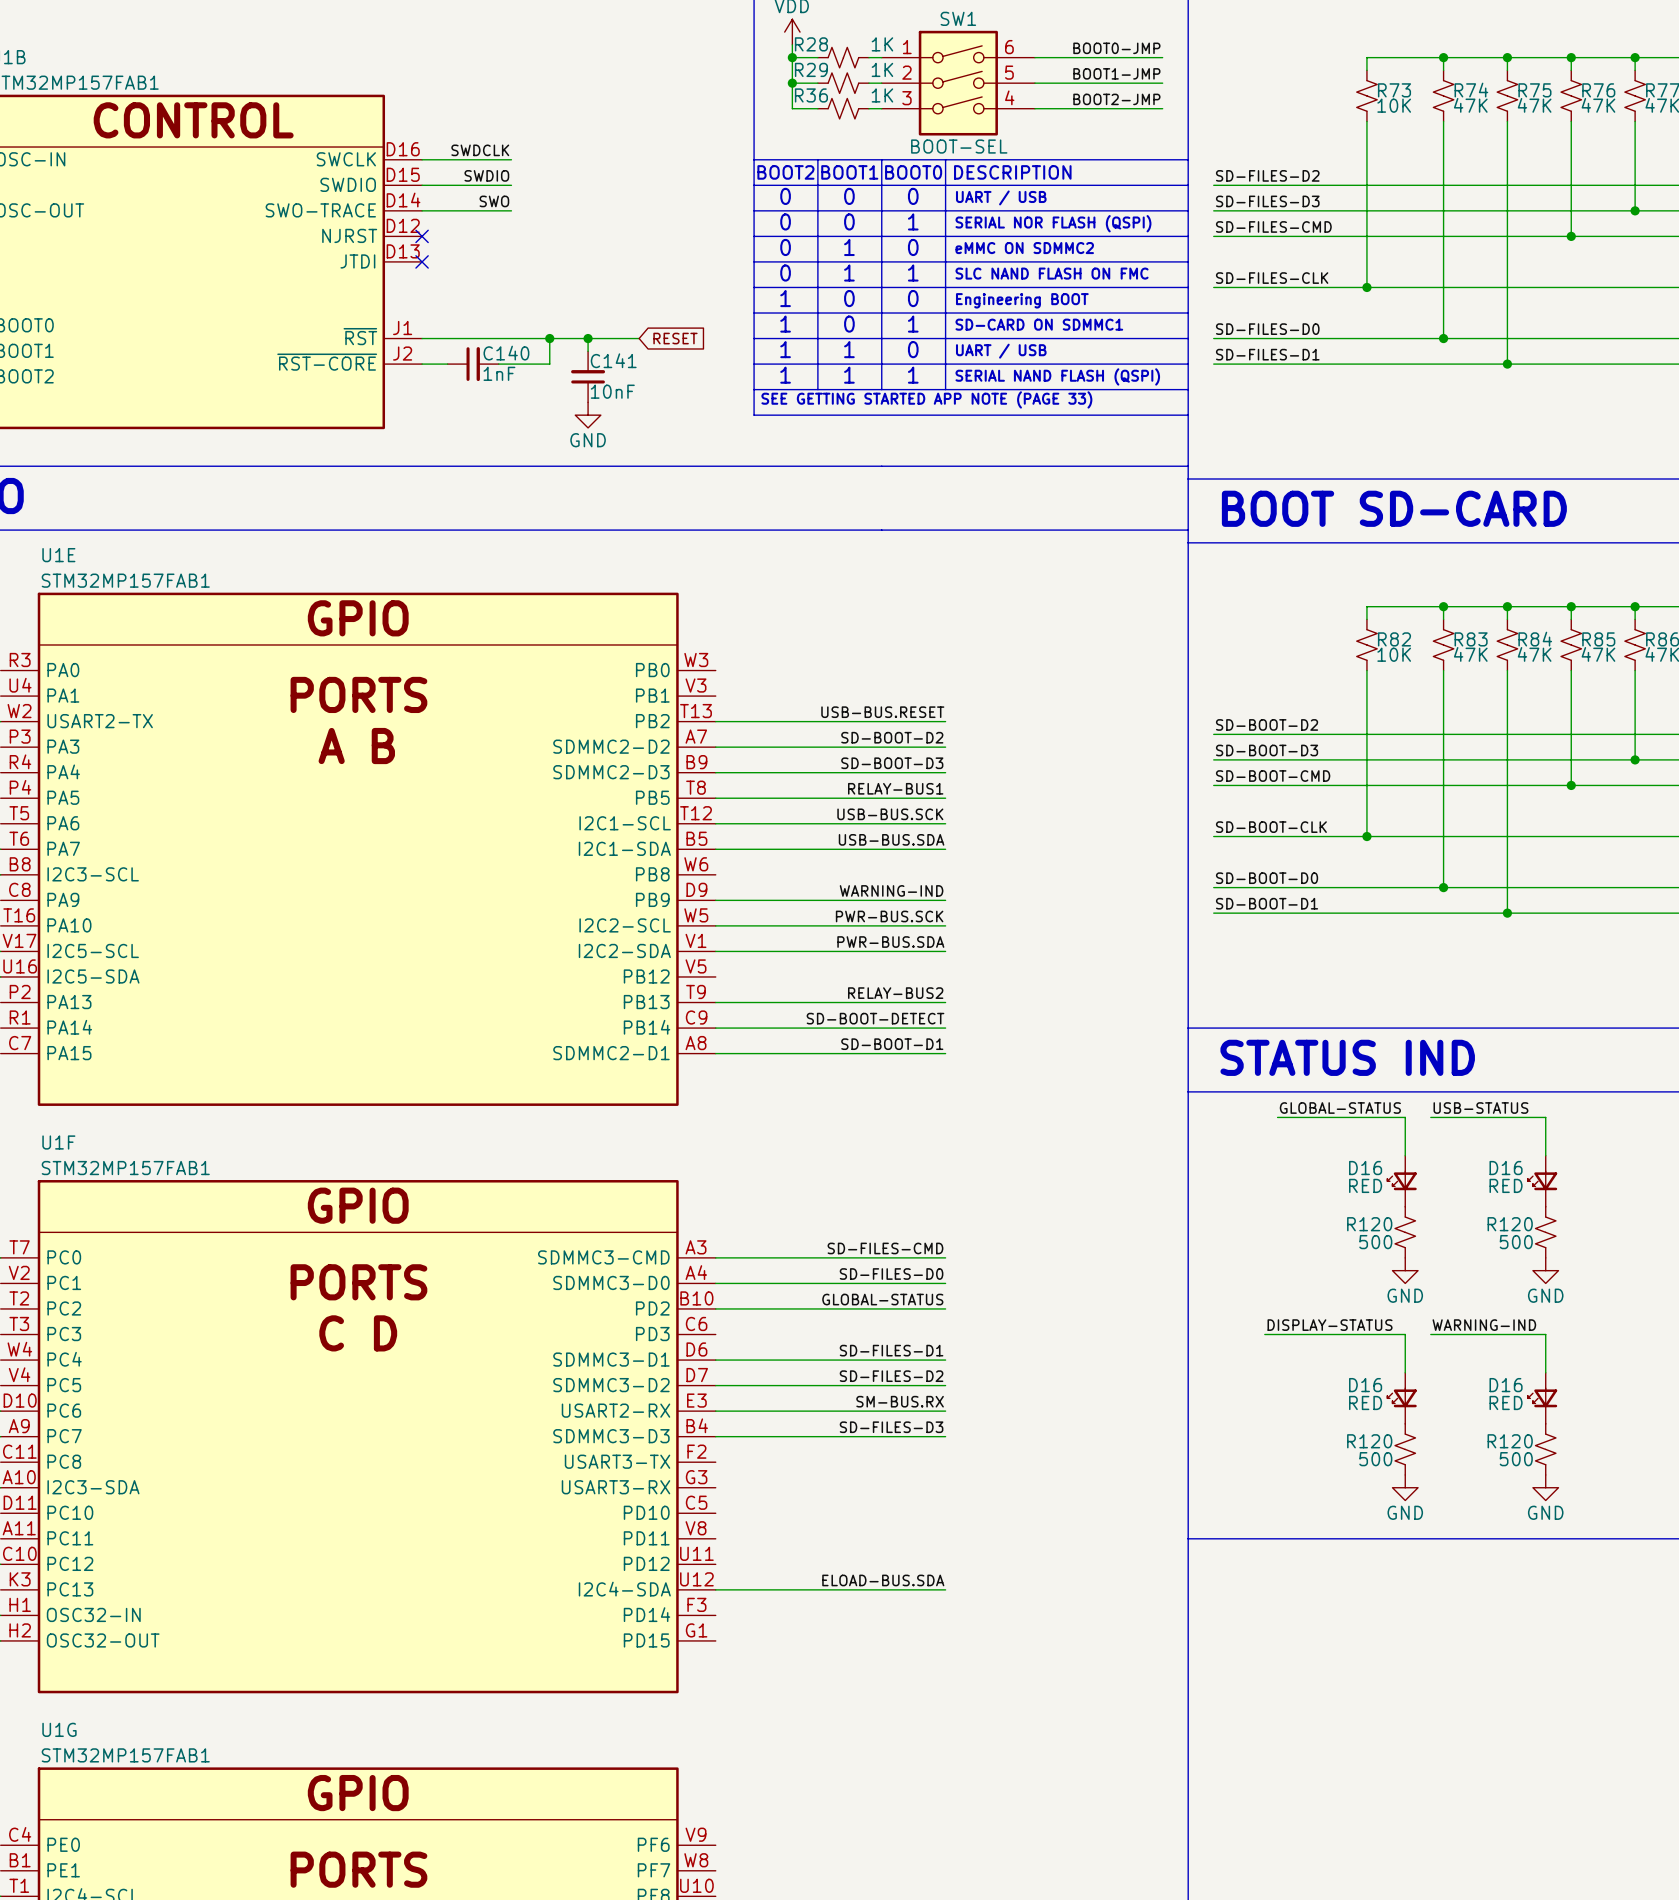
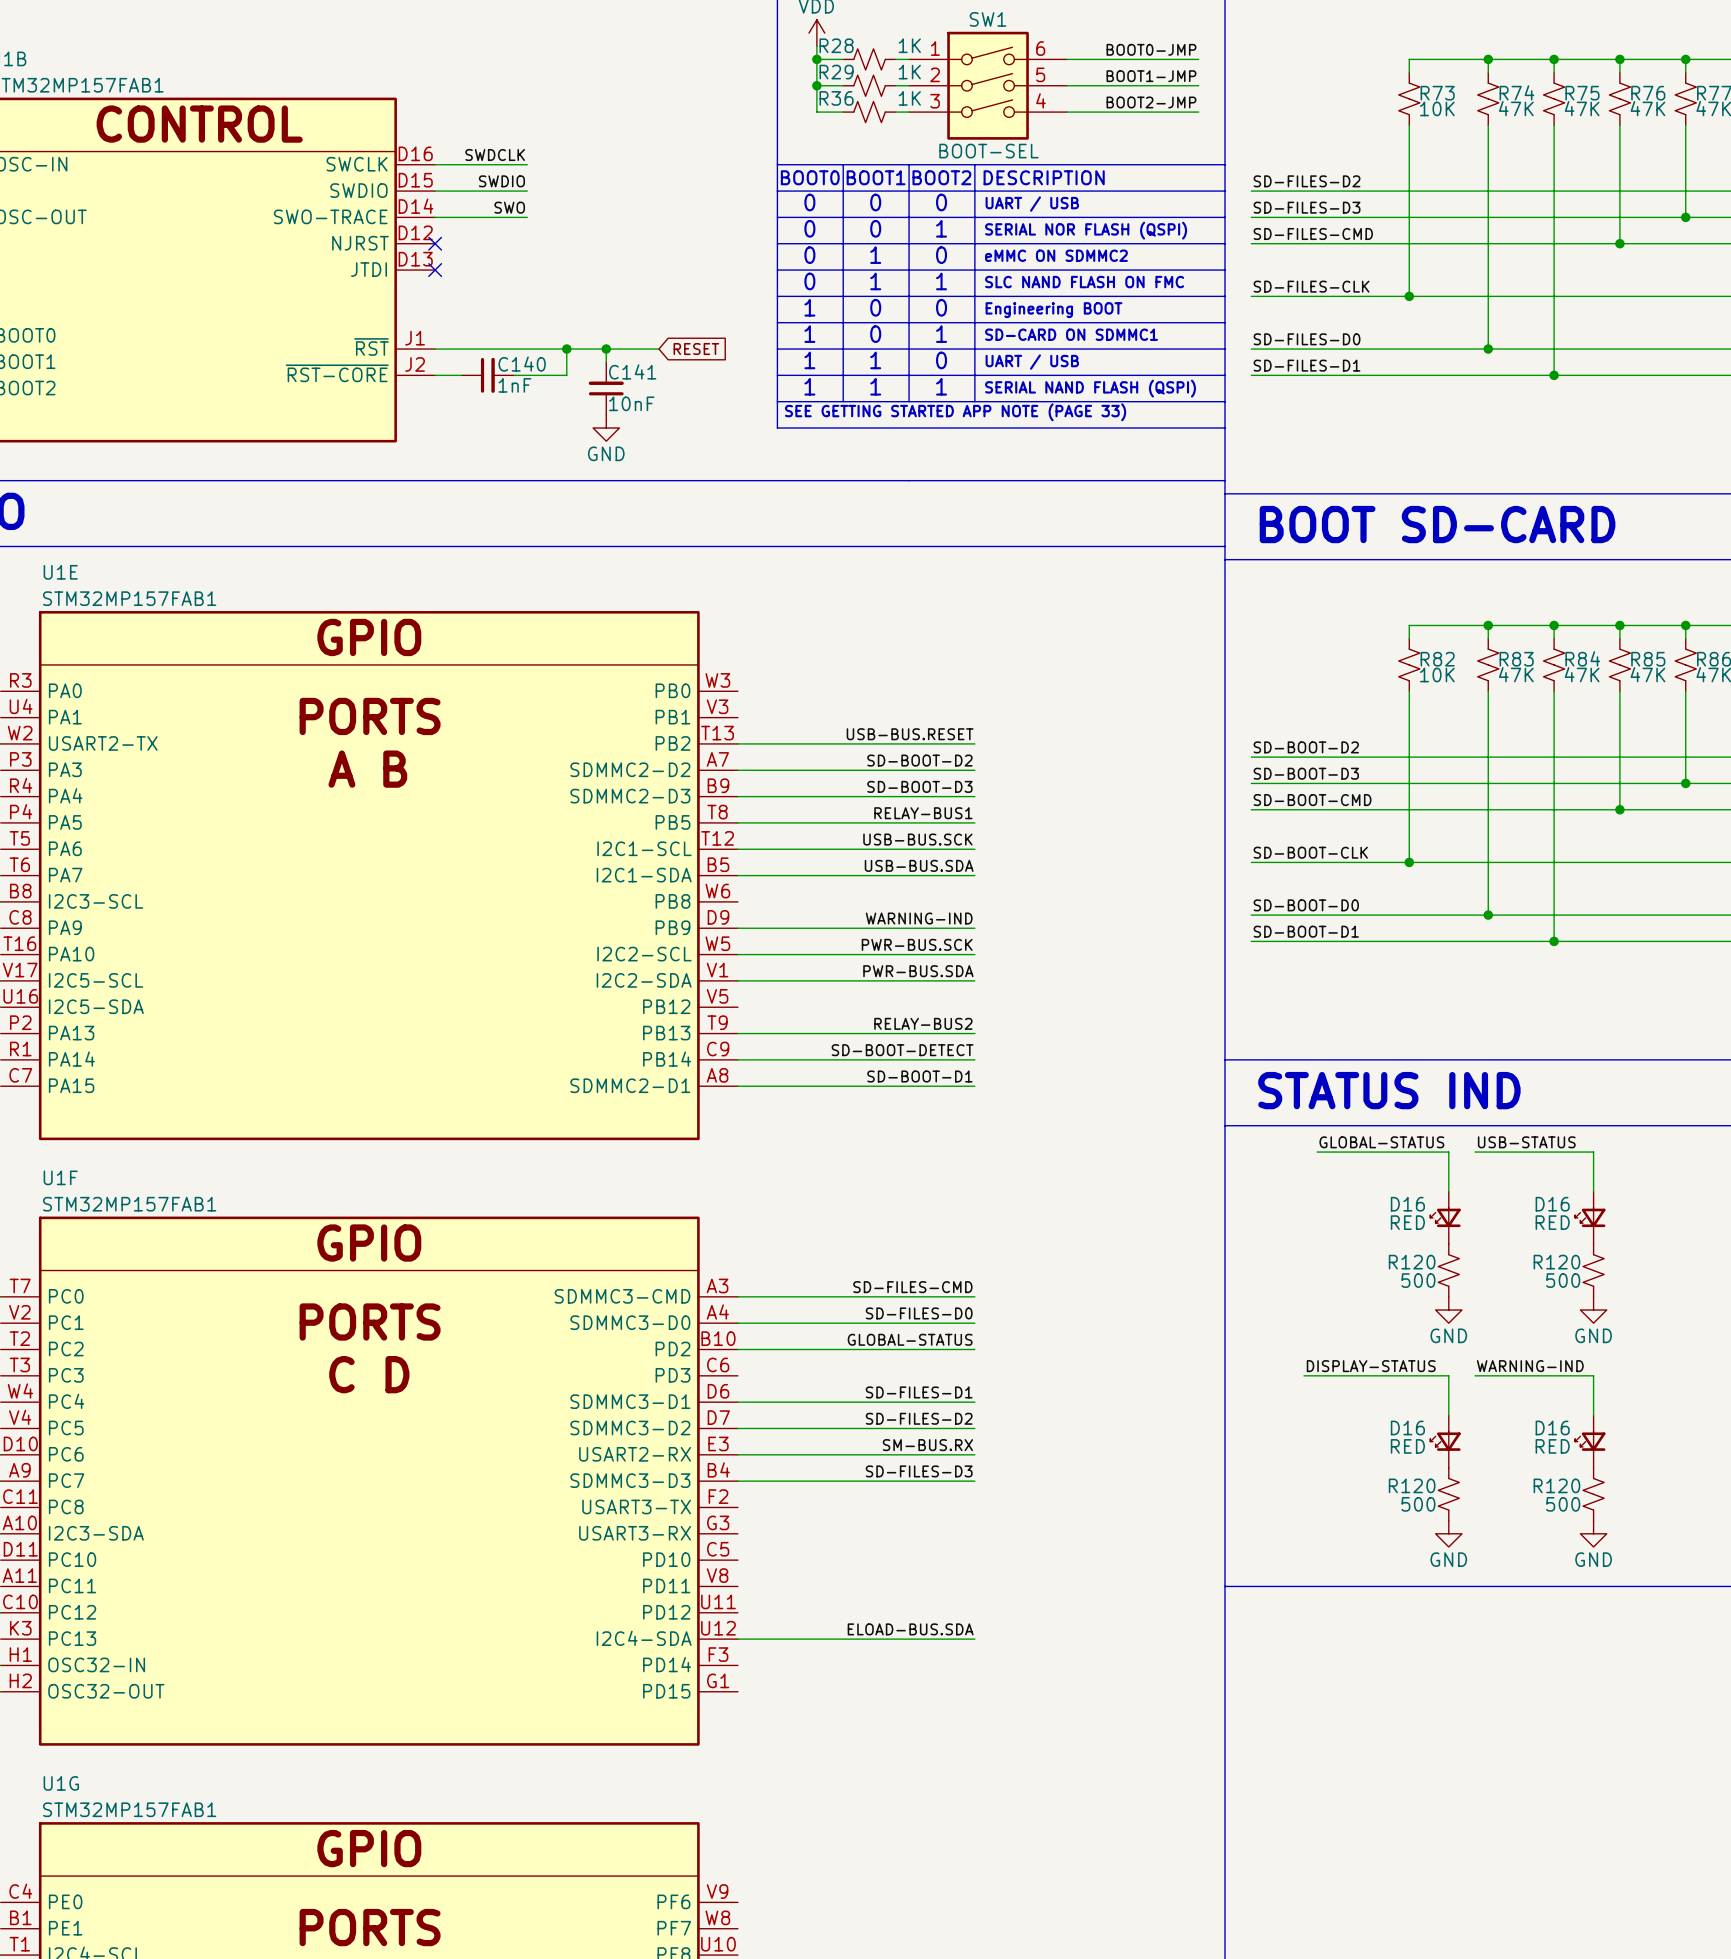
text: BOOT2 (785, 172) -> BOOT0 (810, 177)
text: BOOT0 (913, 172) -> BOOT2 (941, 177)

